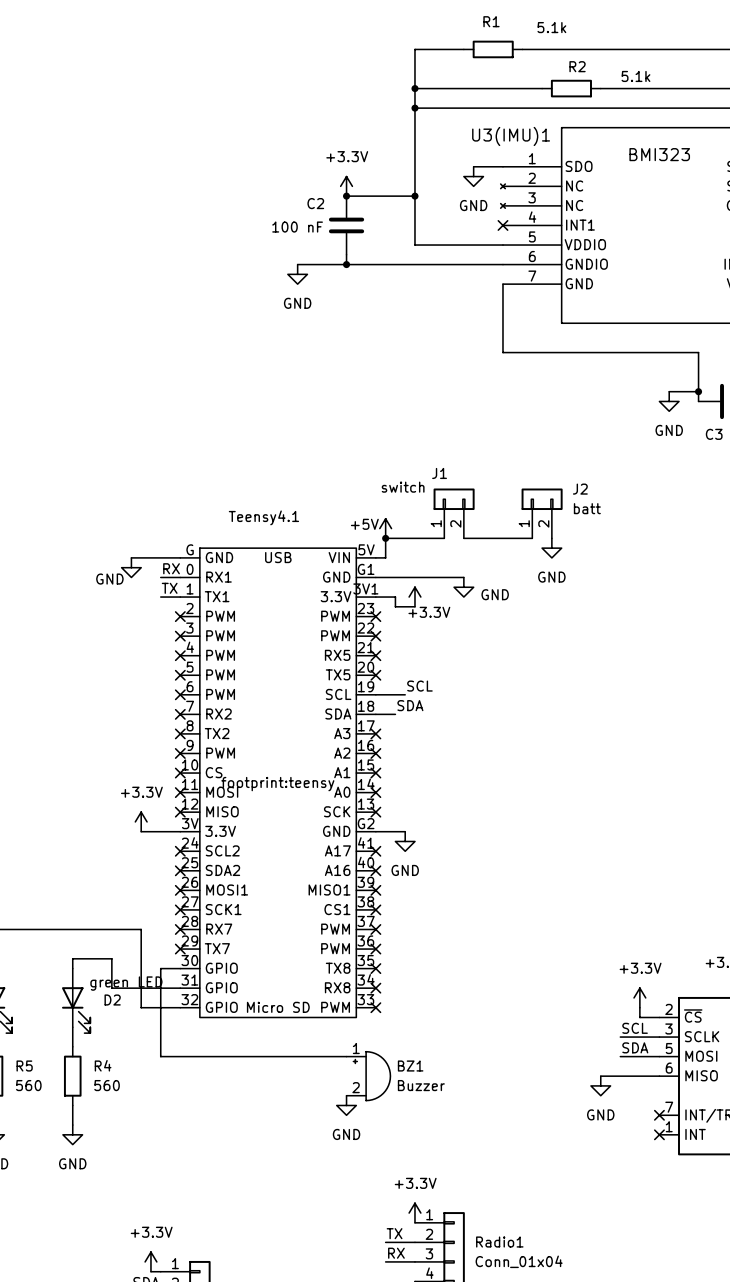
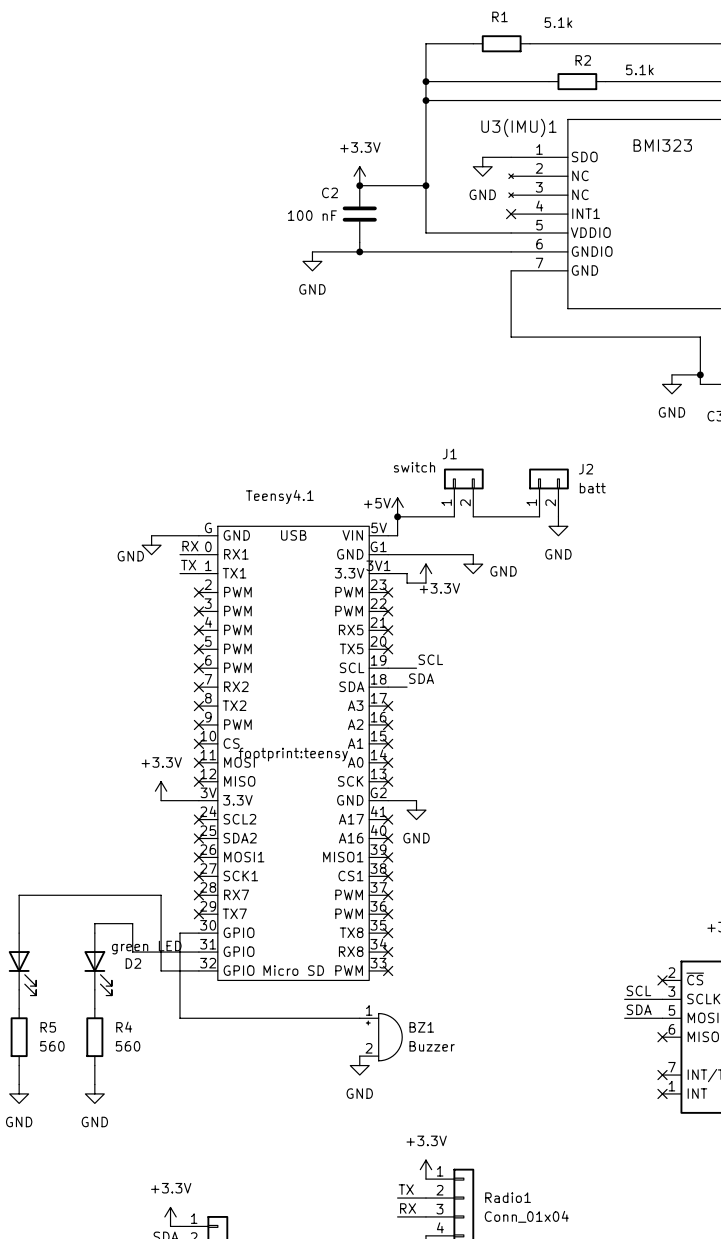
power symbol: +3.3V (639, 997) -> none
wire: (639, 1007) (639, 1017) (659, 1017) -> none
no-connect mark: none -> (662, 980)
wire: (600, 1076) (659, 1076) -> none
no-connect mark: none -> (662, 1037)
power symbol: GND (600, 1085) -> none

